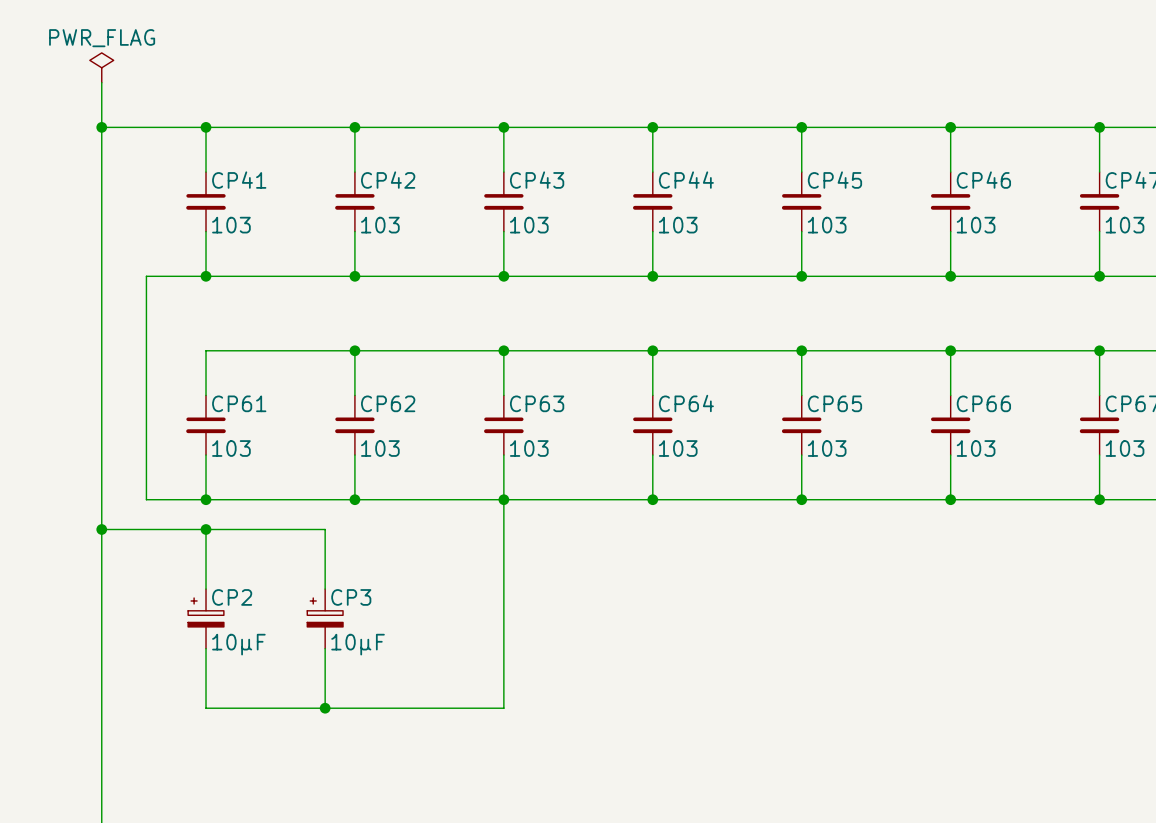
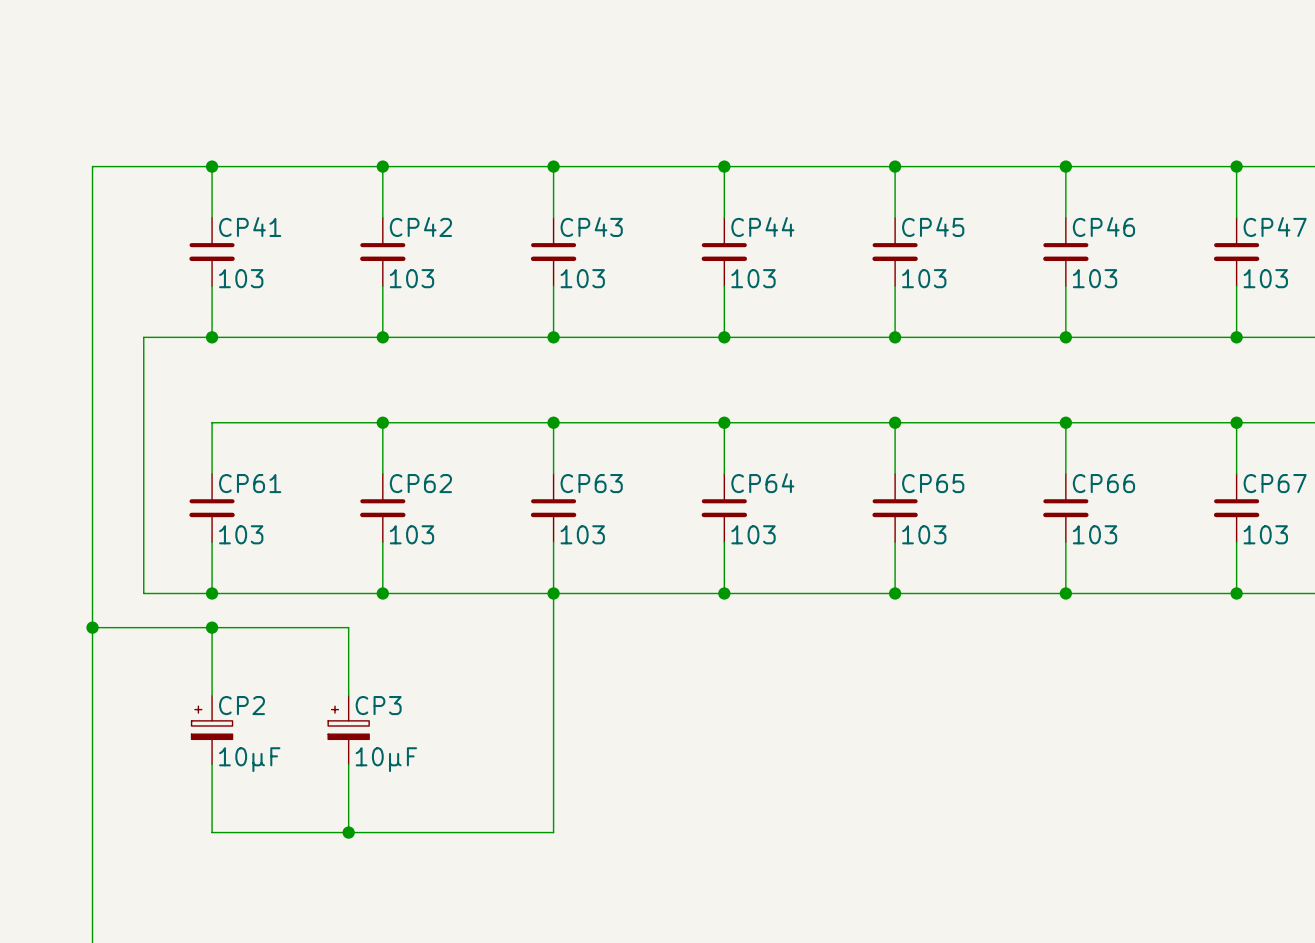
power symbol: PWR_FLAG (101, 67) -> none
wire: (101, 82) (101, 127) -> none
junction: (101, 127) -> none

